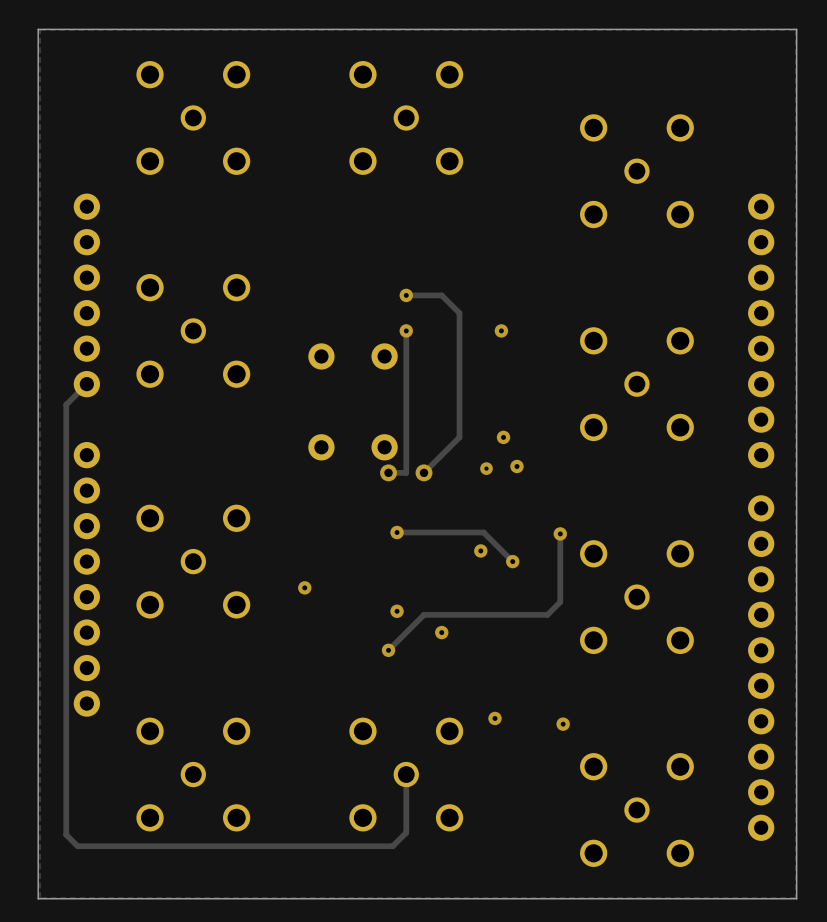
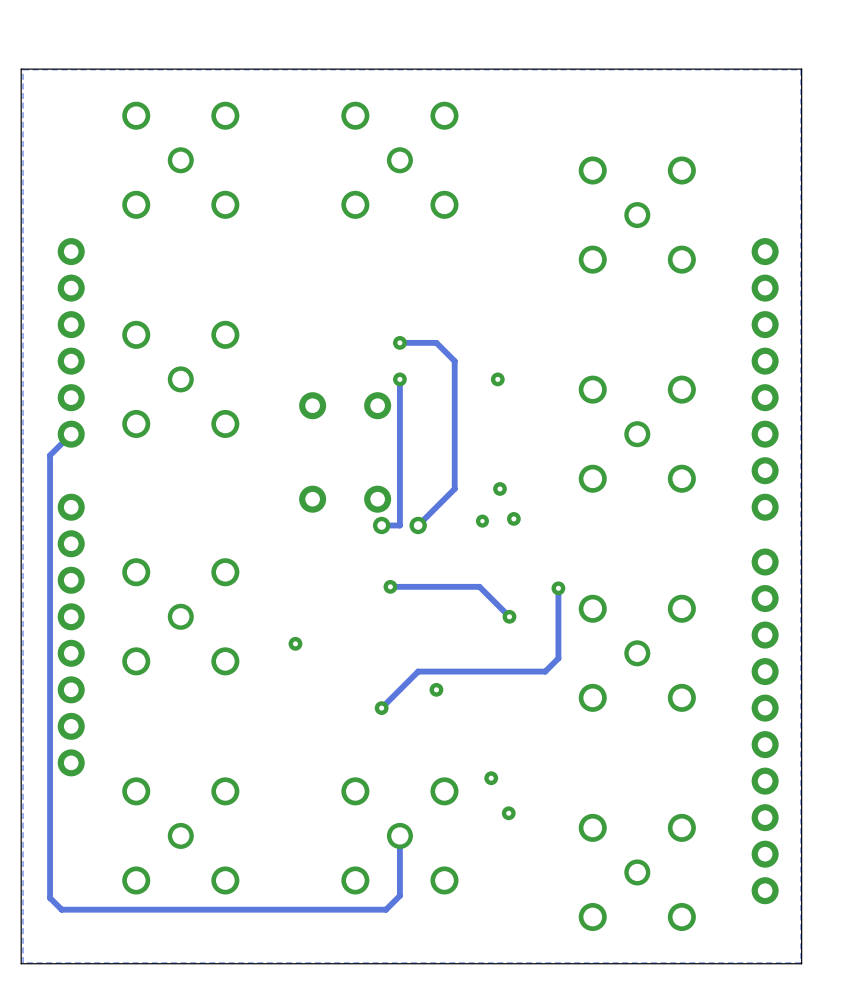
via: (480, 550) -> none
via: (397, 611) -> none
via position: (563, 724) -> (508, 813)

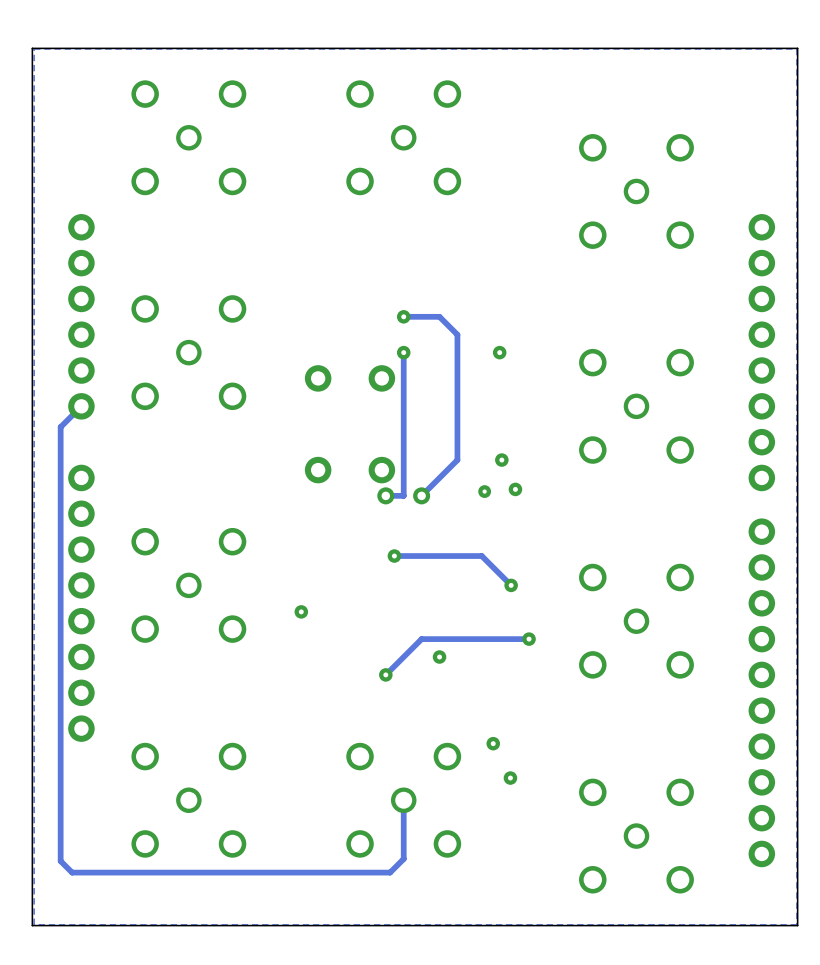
track: (558, 588) (558, 658) (545, 671) (527, 671) -> none
via: (558, 588) -> none
via: none -> (529, 639)

